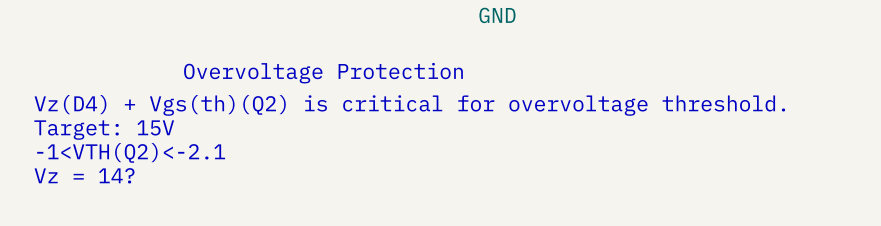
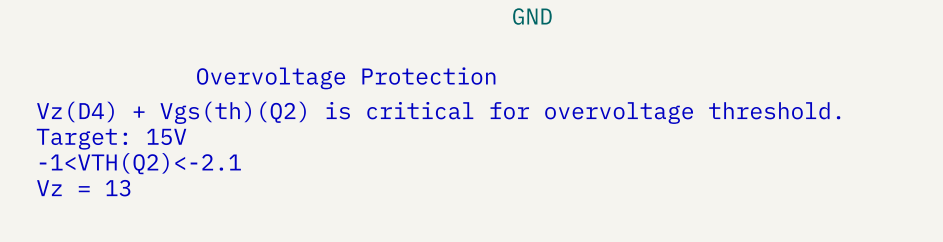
text: Vz = 14? (84, 175) -> Vz = 13 (83, 188)

